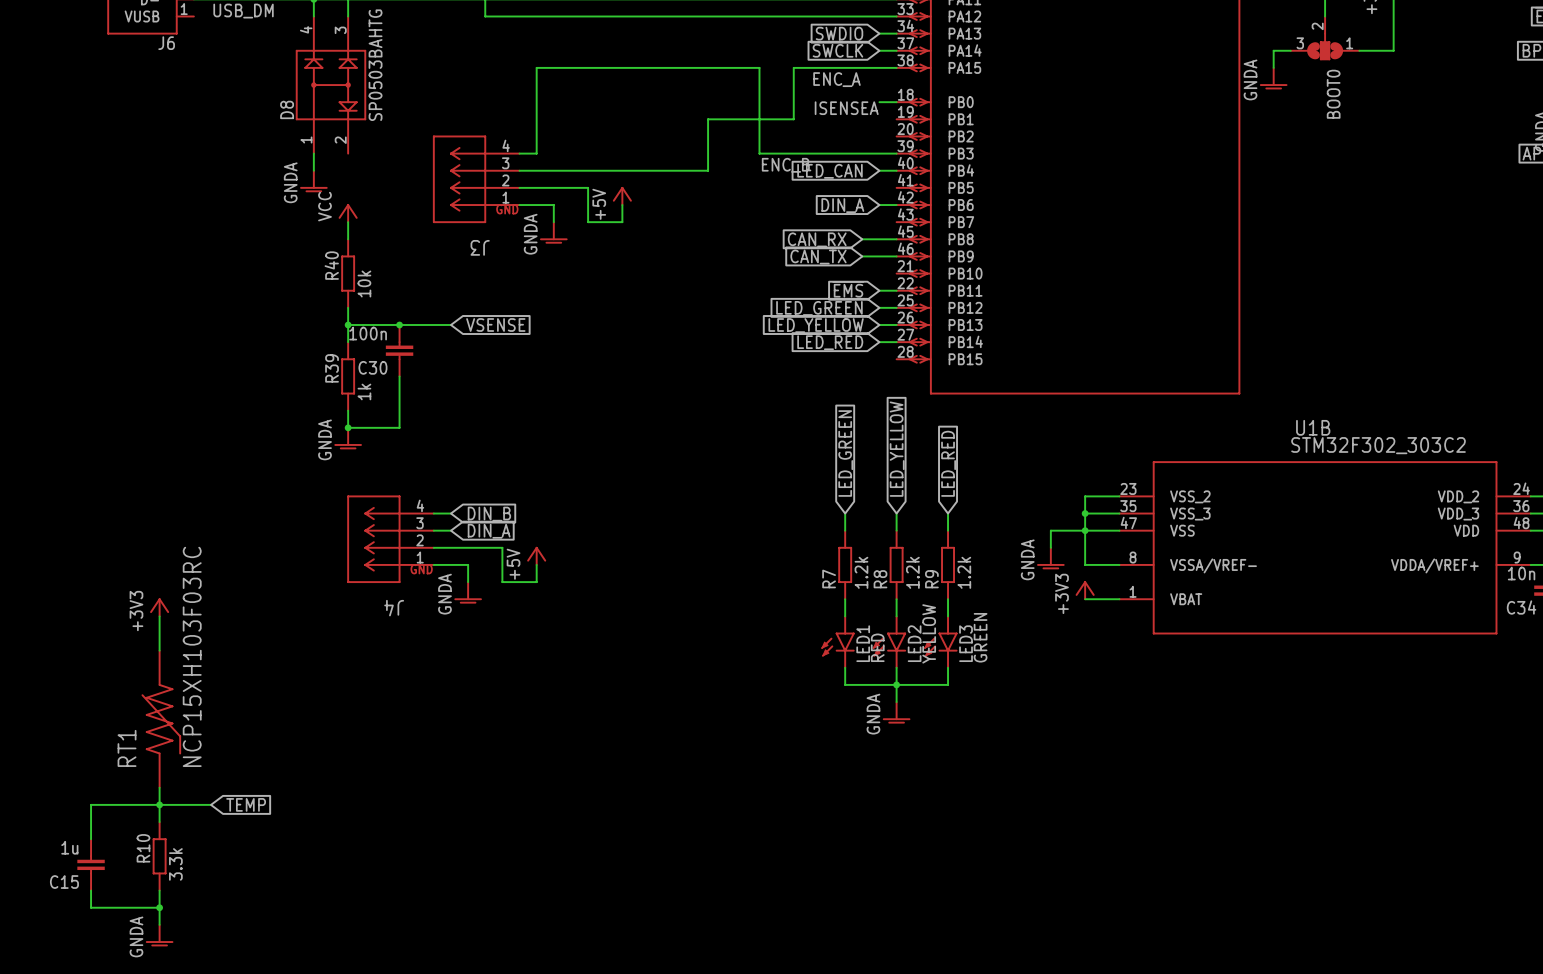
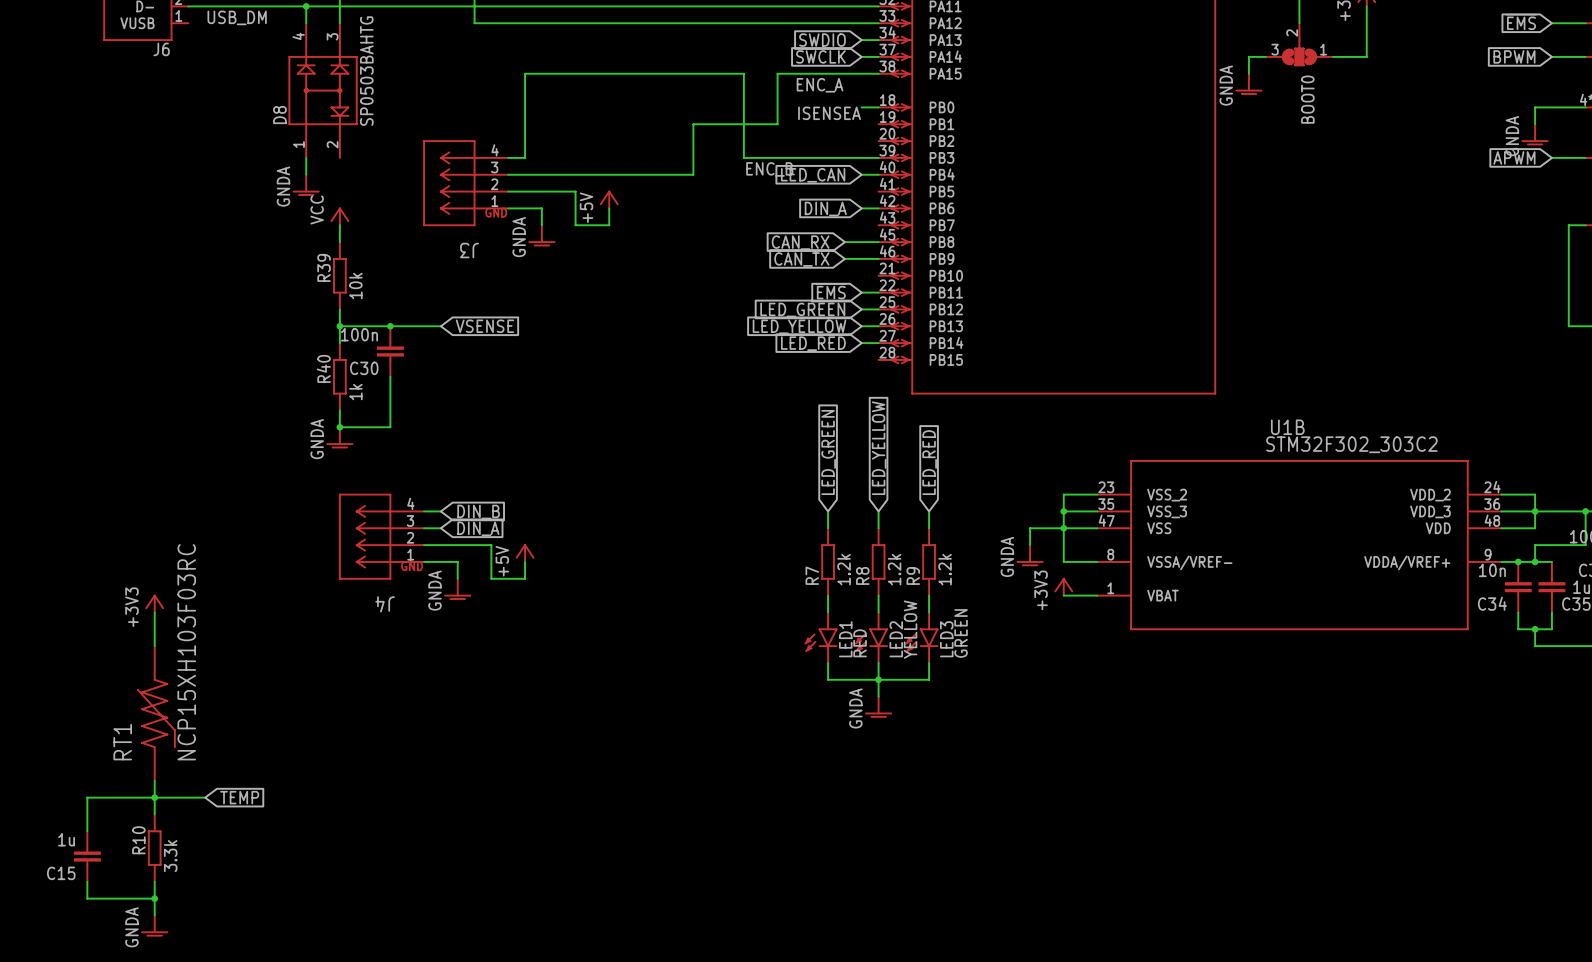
R40 name: R40 (331, 265) -> R39 (324, 267)
R39 name: R39 (332, 368) -> R40 (323, 368)

